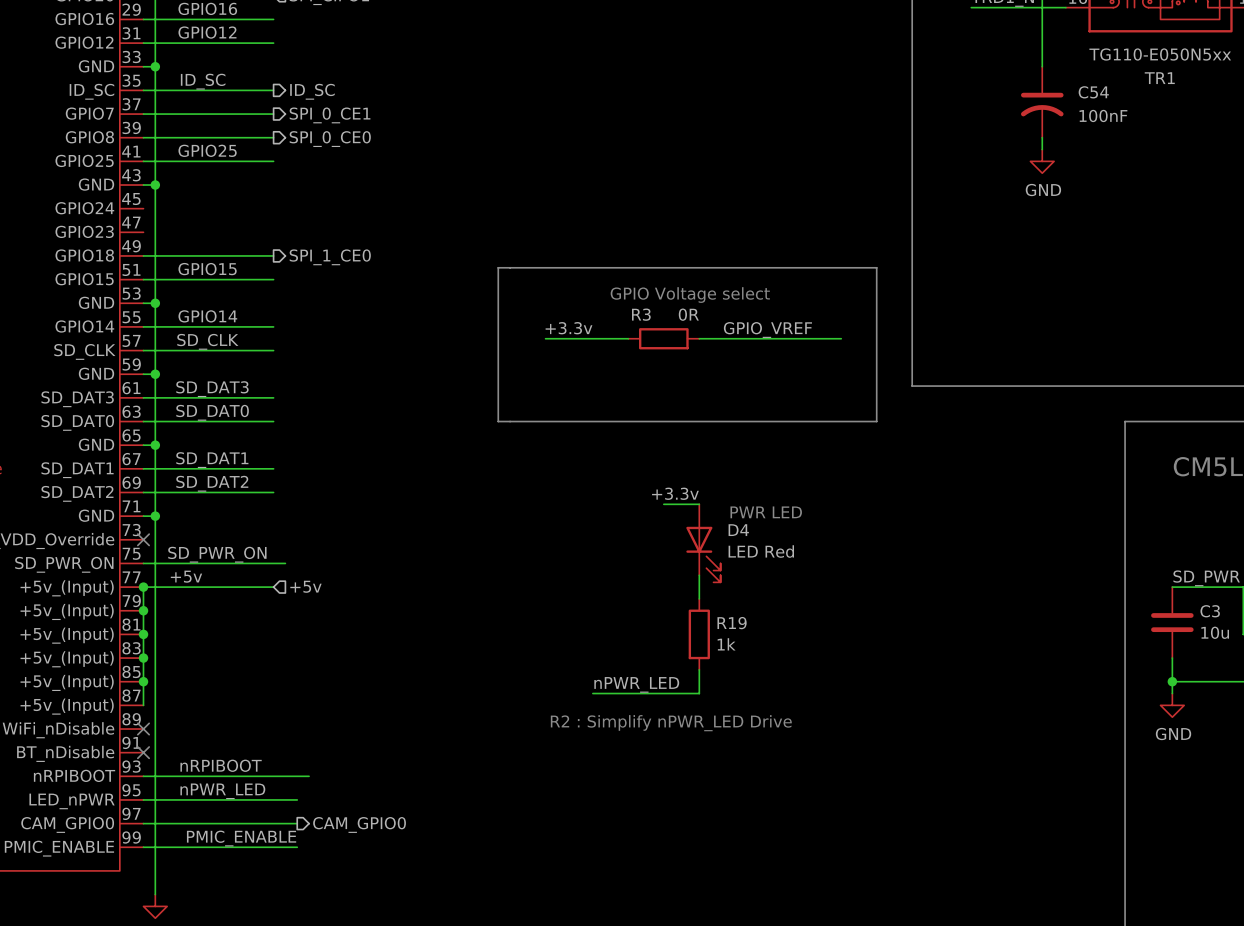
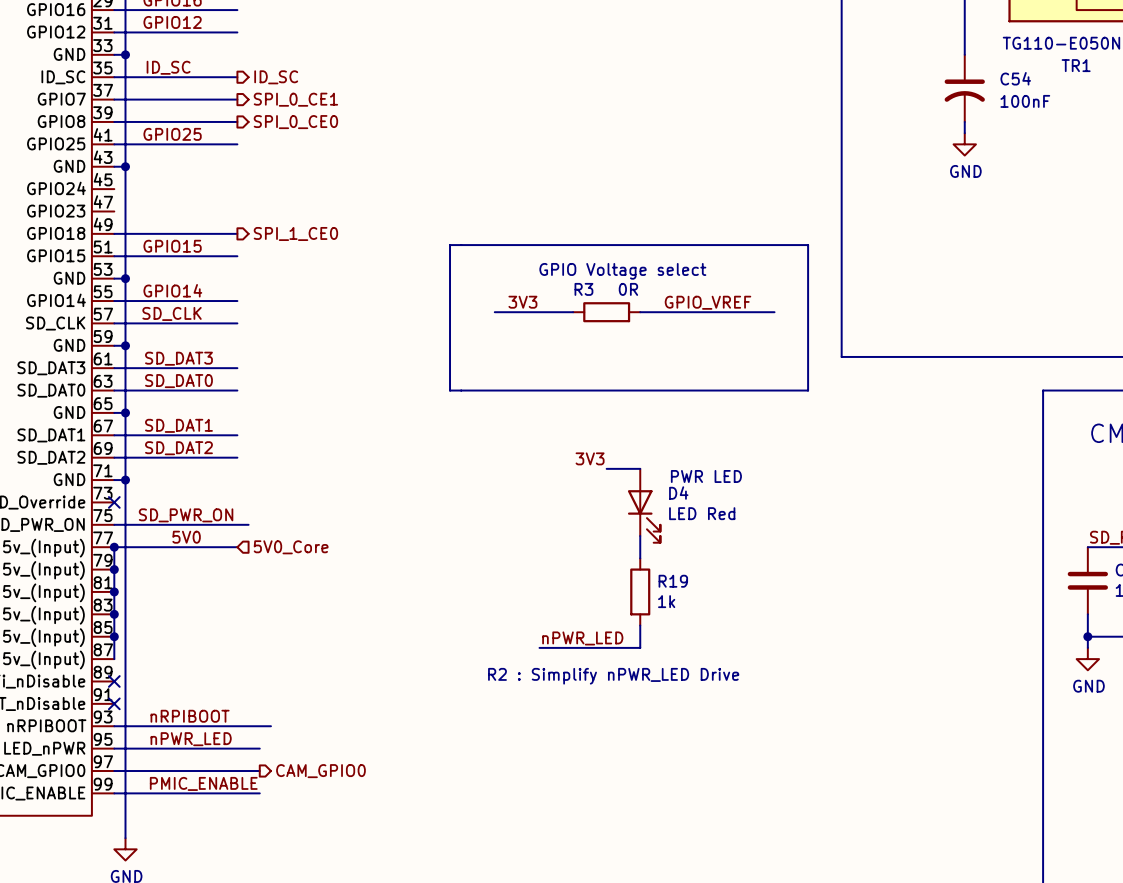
label: +3.3v (569, 328) -> 3V3 (522, 302)
label: none -> 3V3 (590, 458)
label: +3.3v (675, 493) -> none
label: +5v (186, 576) -> 5V0 (186, 537)
hierarchical label: +5v (305, 586) -> 5V0_Core (291, 547)

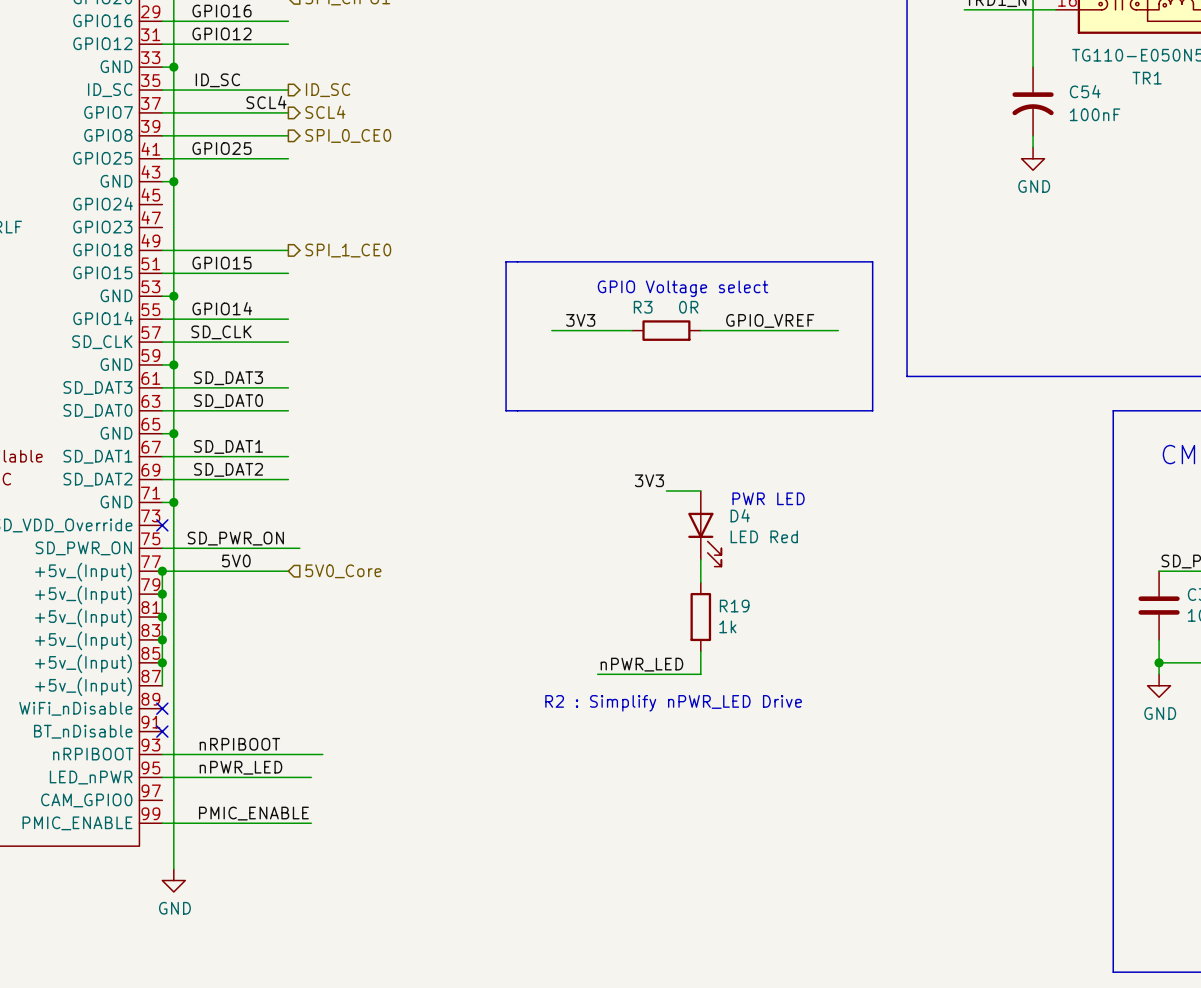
label: none -> SCL4 (266, 102)
hierarchical label: SPI_0_CE1 (295, 99) -> SCL4 (325, 112)
wire: (114, 771) (259, 771) -> none
hierarchical label: CAM_GPIO0 (320, 771) -> none

